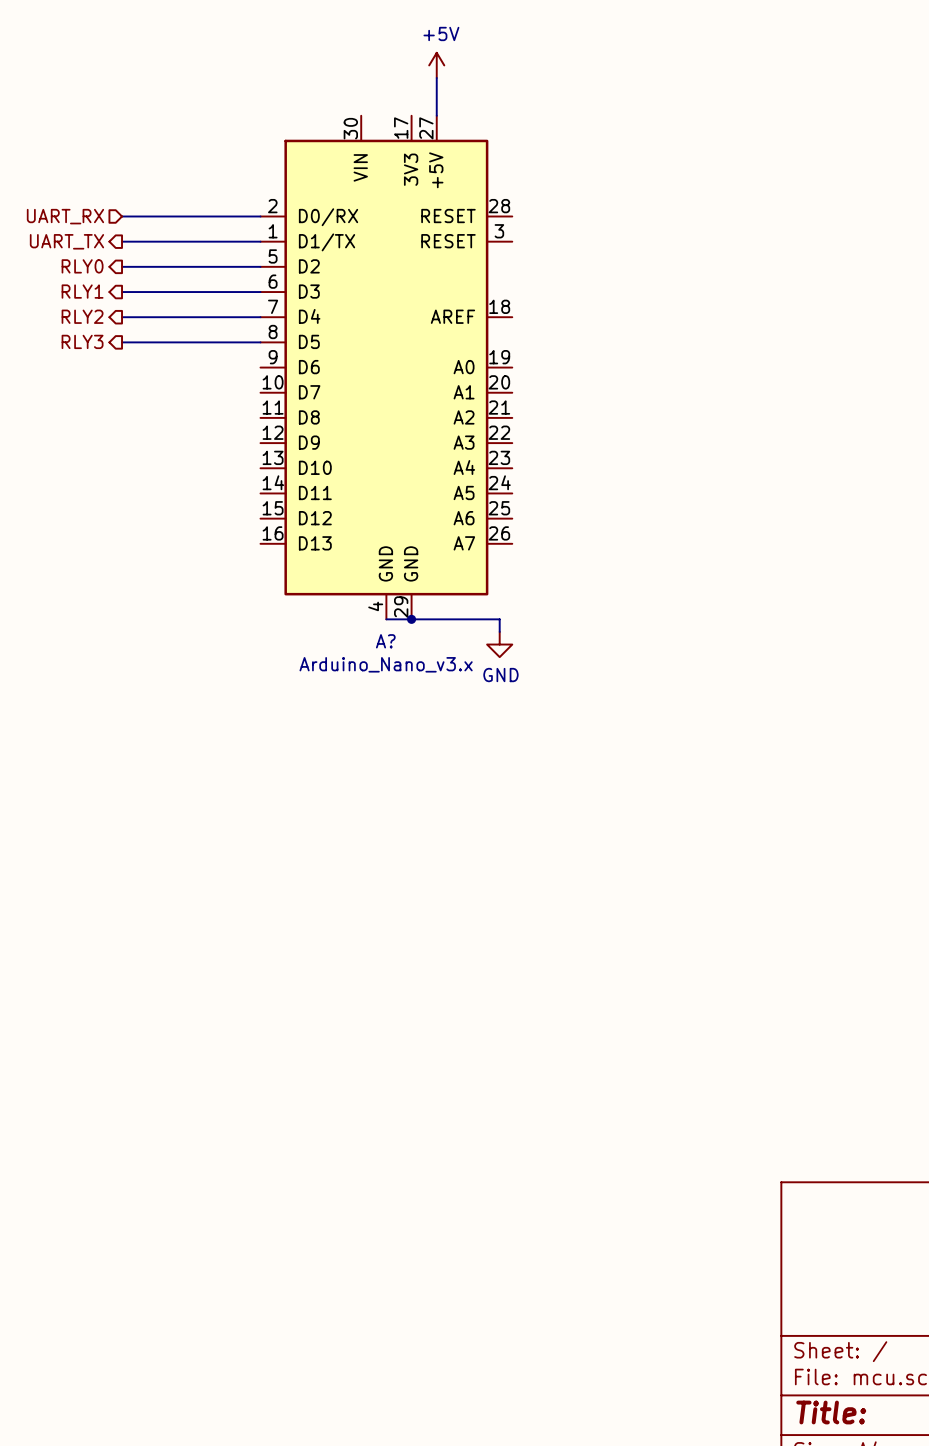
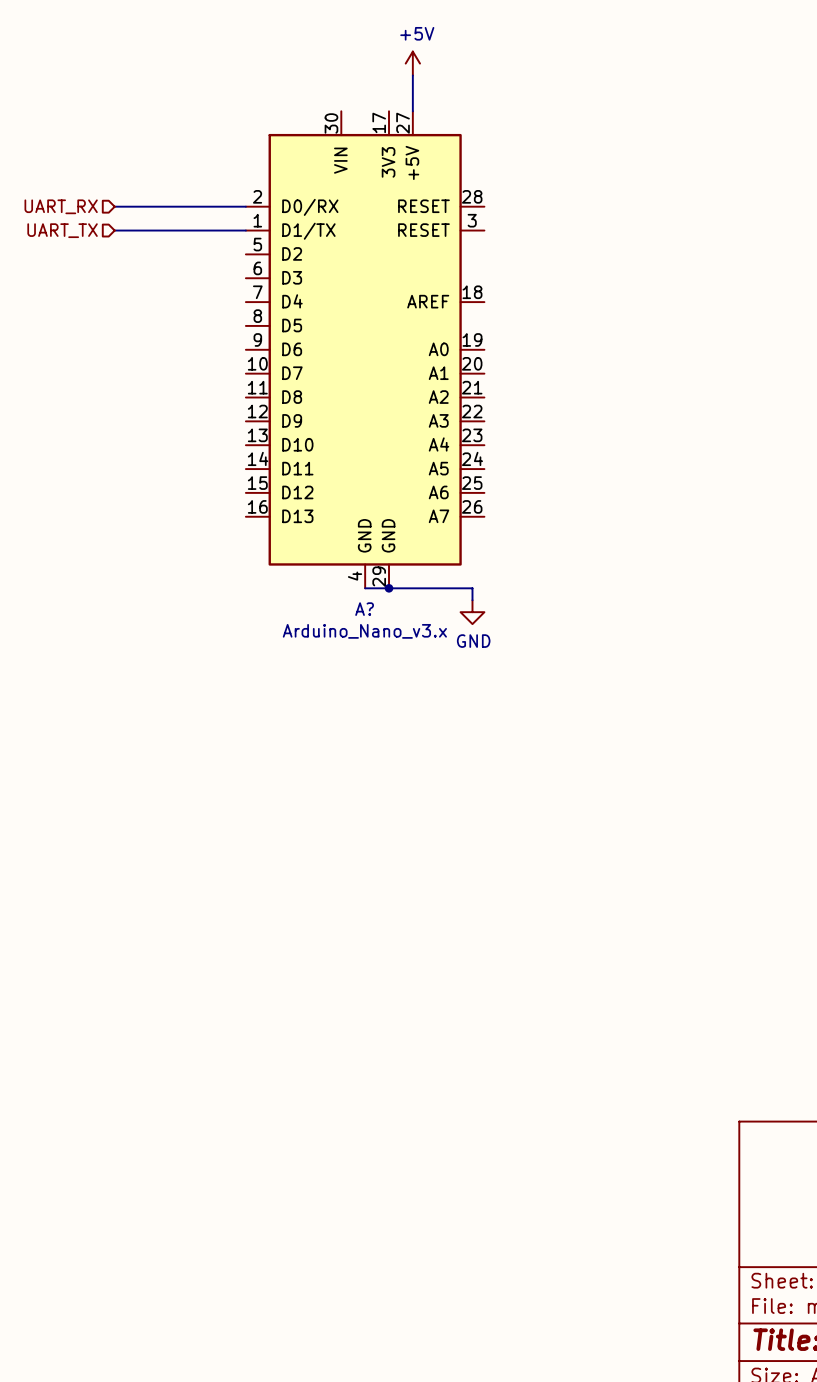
hierarchical label shape: output (66, 241) -> input (62, 230)
hierarchical label: RLY0 (82, 266) -> none
wire: (122, 266) (260, 266) -> none
hierarchical label: RLY1 (82, 291) -> none
wire: (122, 292) (260, 292) -> none
hierarchical label: RLY2 (82, 316) -> none
wire: (122, 317) (260, 317) -> none
hierarchical label: RLY3 (82, 341) -> none
wire: (122, 342) (260, 342) -> none

